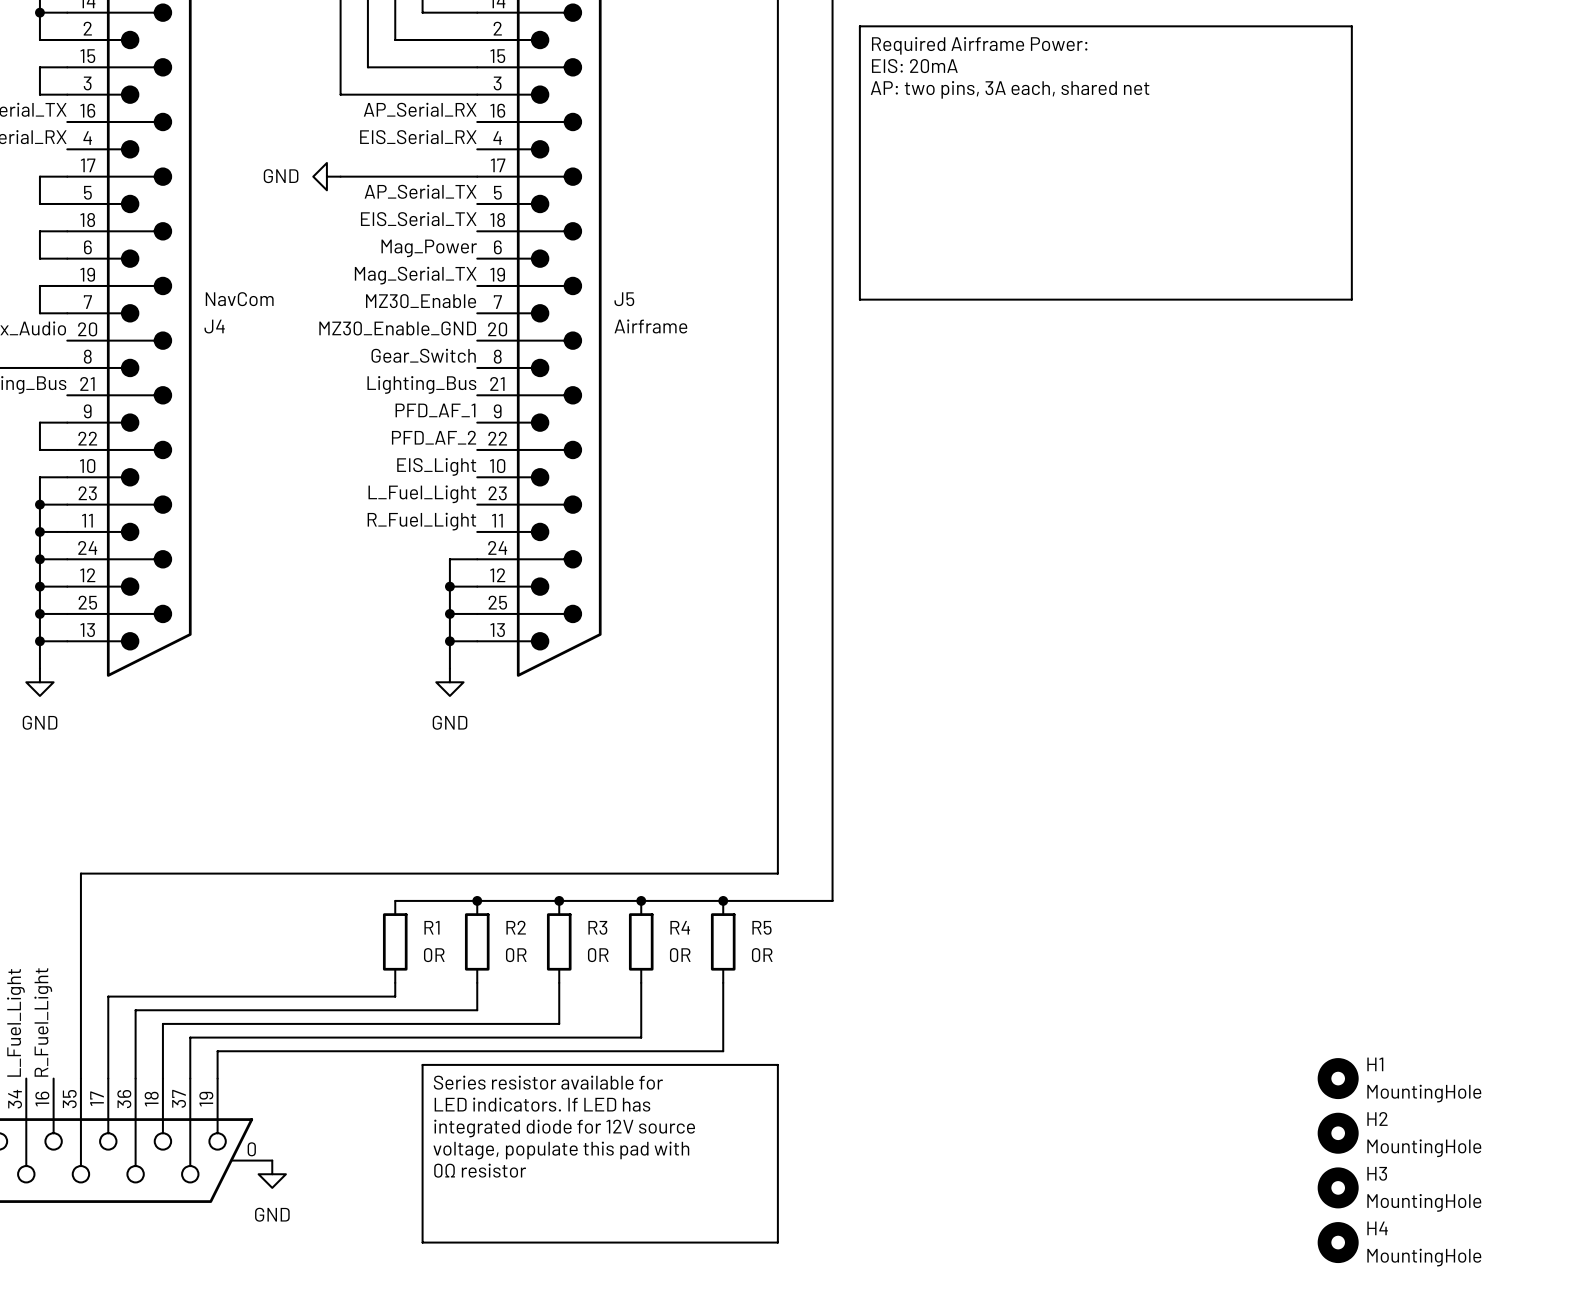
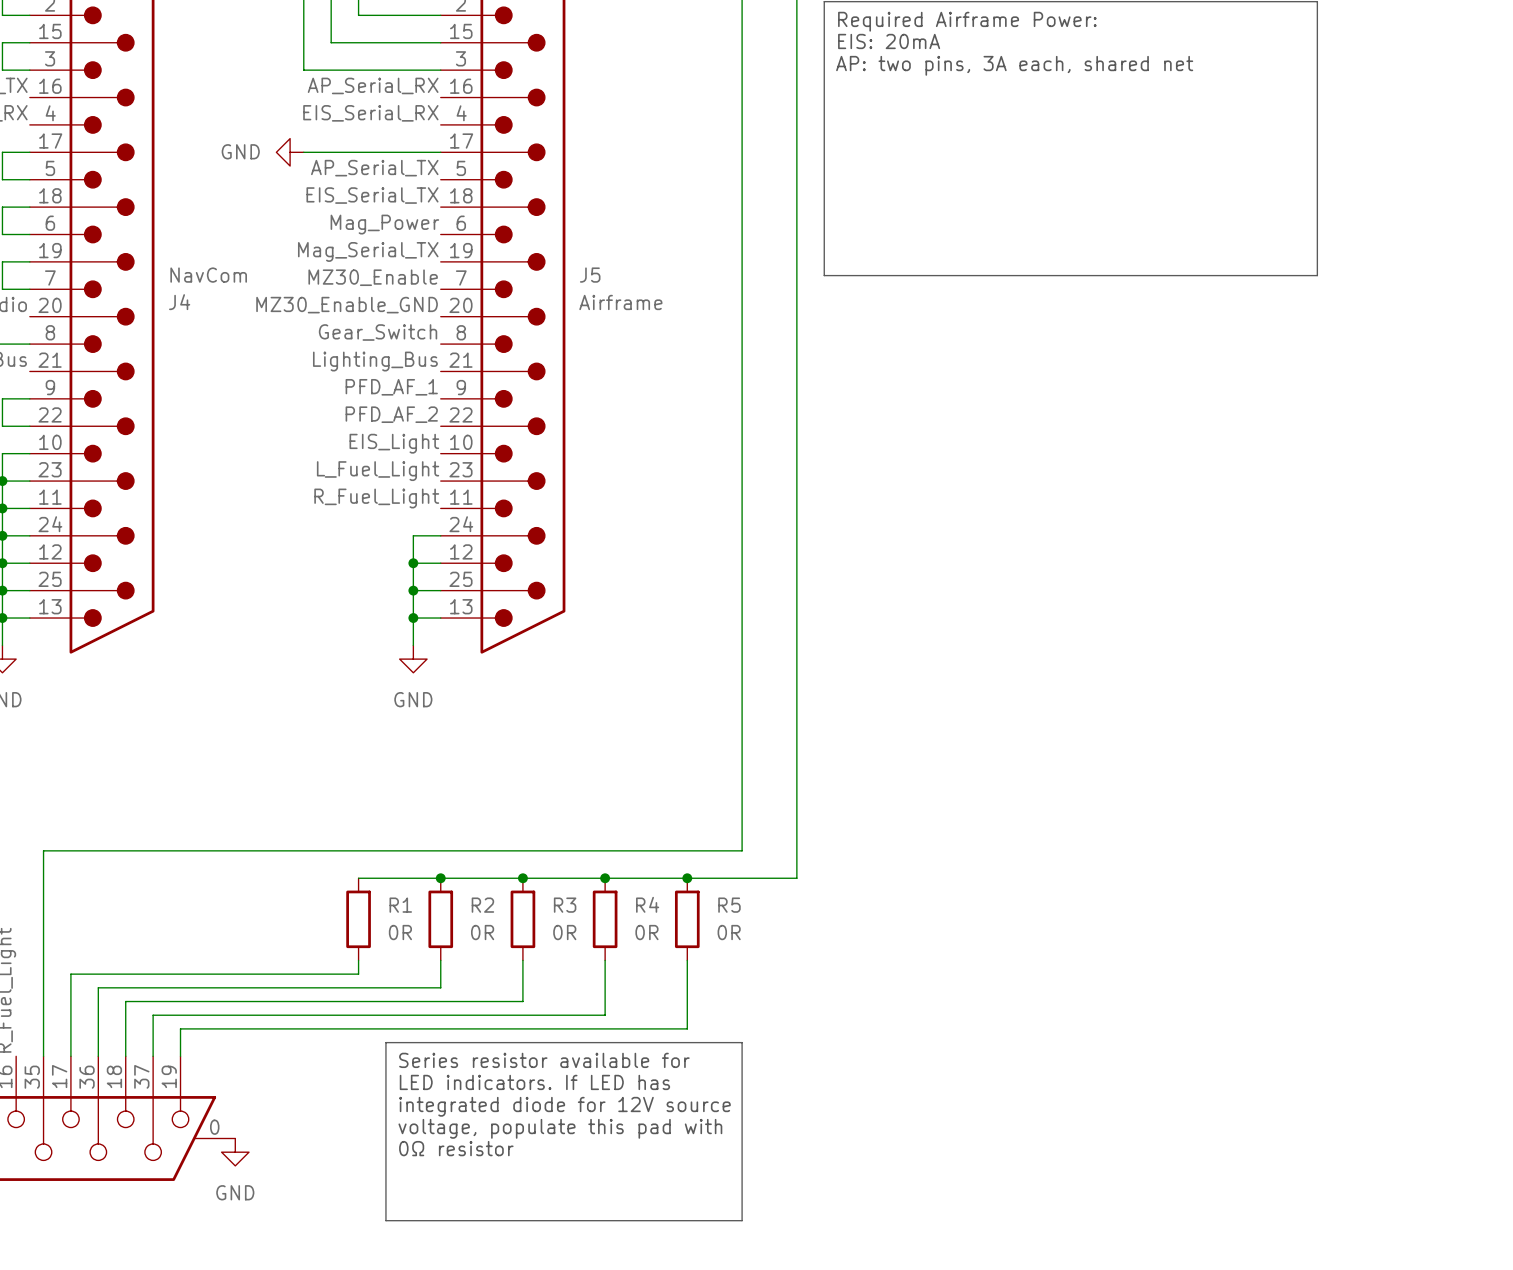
H1: MountingHole (1338, 1078) -> none
H2: MountingHole (1338, 1133) -> none
H3: MountingHole (1338, 1187) -> none
H4: MountingHole (1338, 1242) -> none

